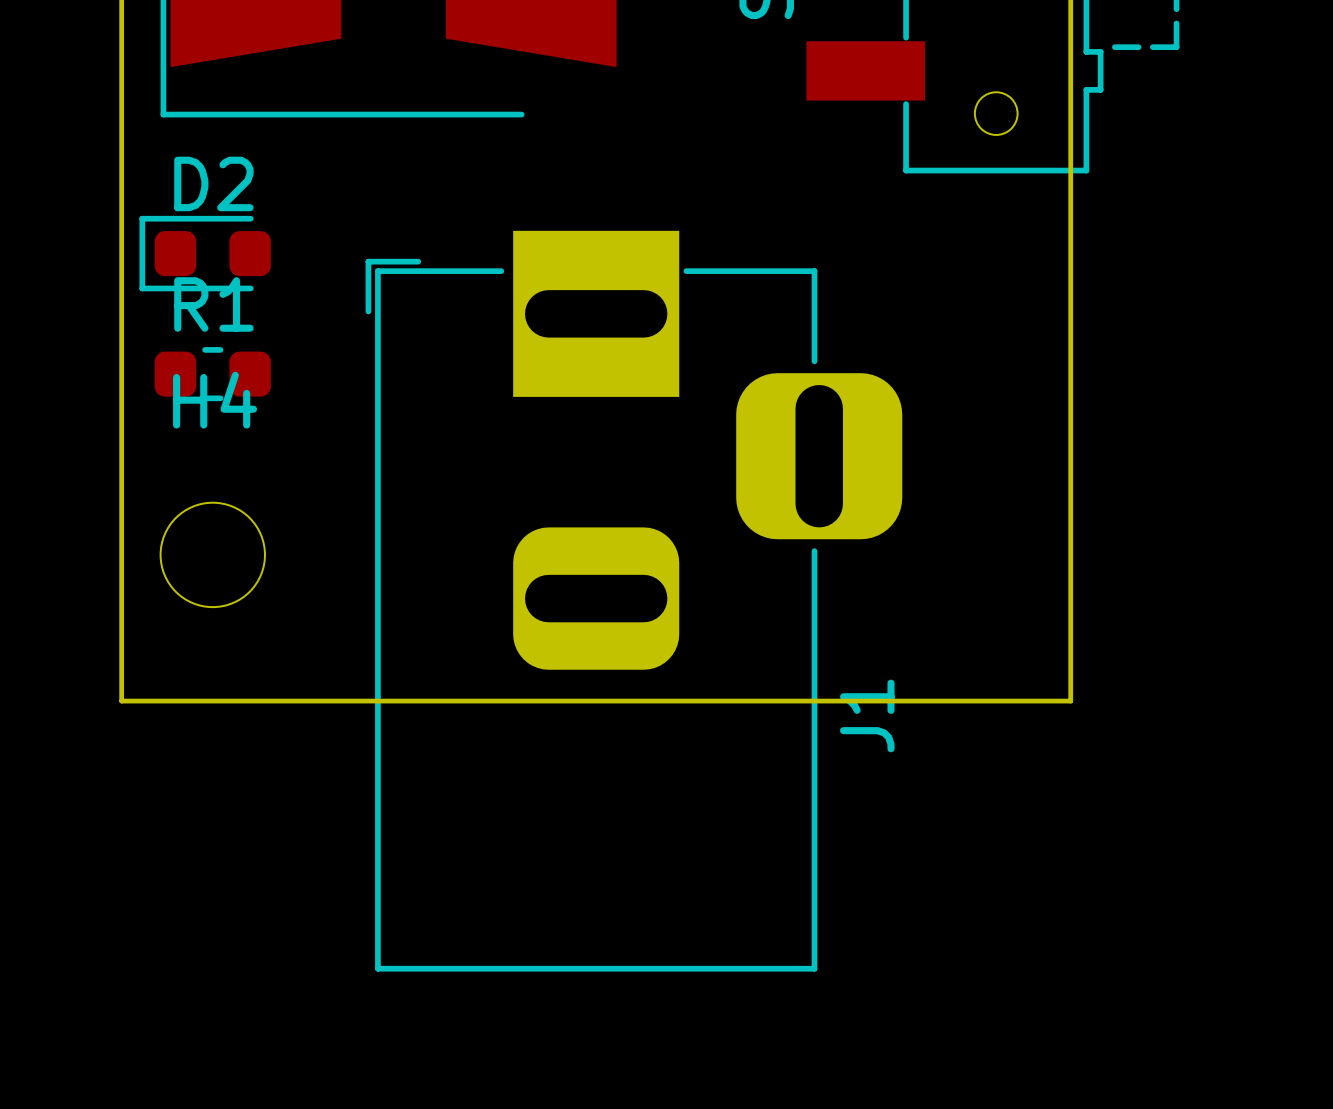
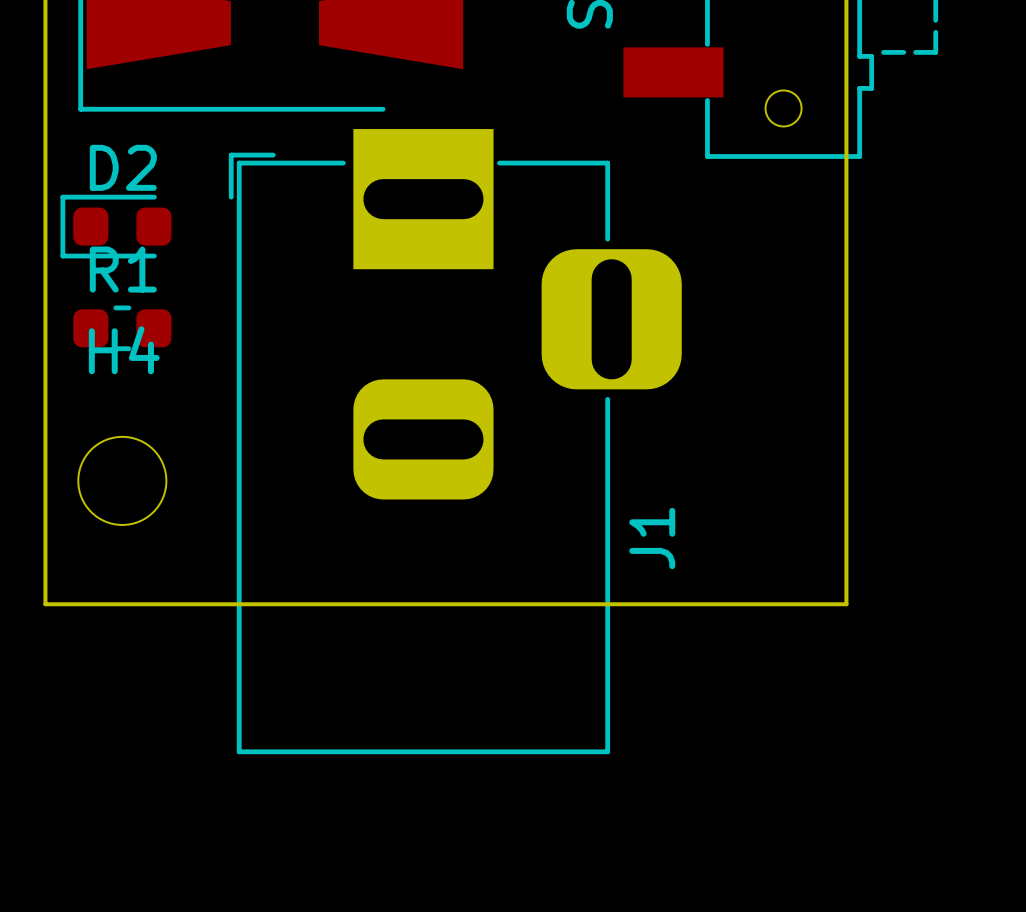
J1 position: (633, 601) -> (455, 441)

